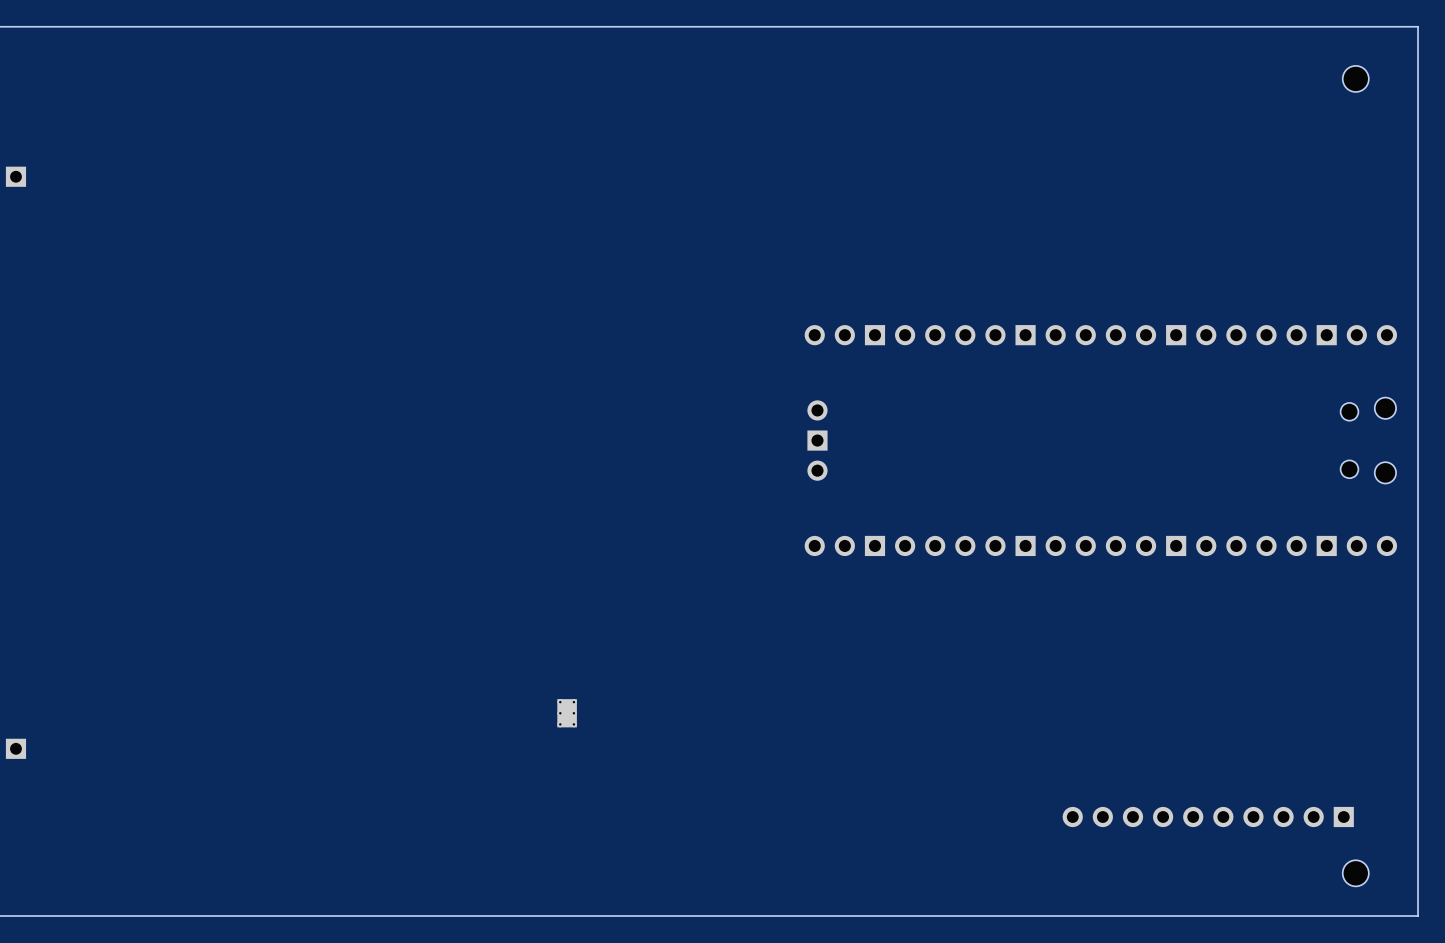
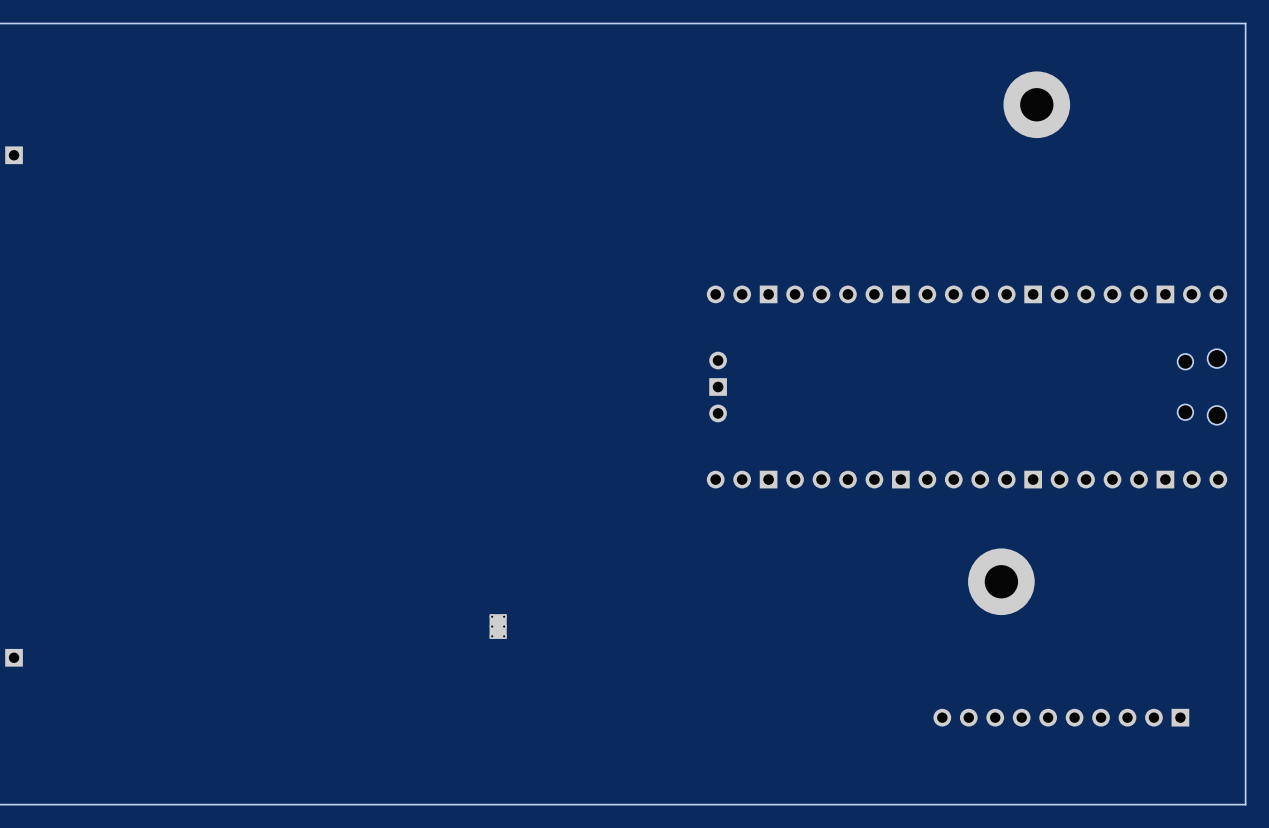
part: (1355, 78) -> none
part: none -> (1036, 104)
part: none -> (1001, 581)
part: (1355, 873) -> none

